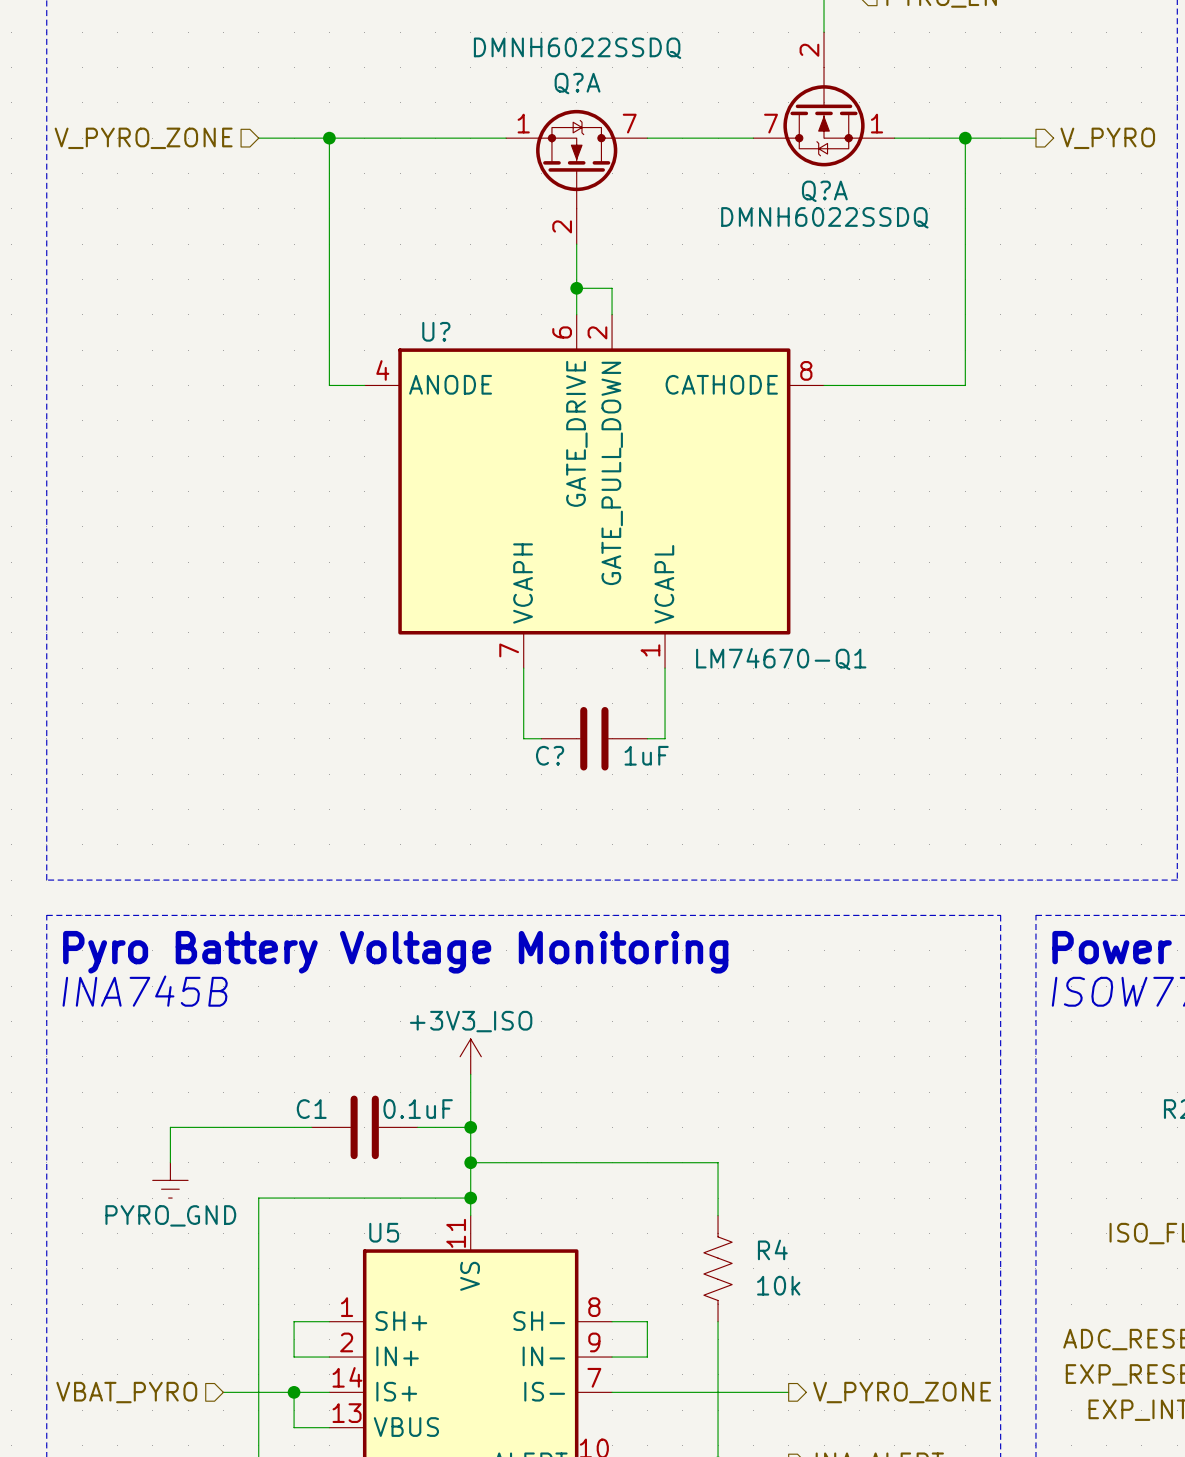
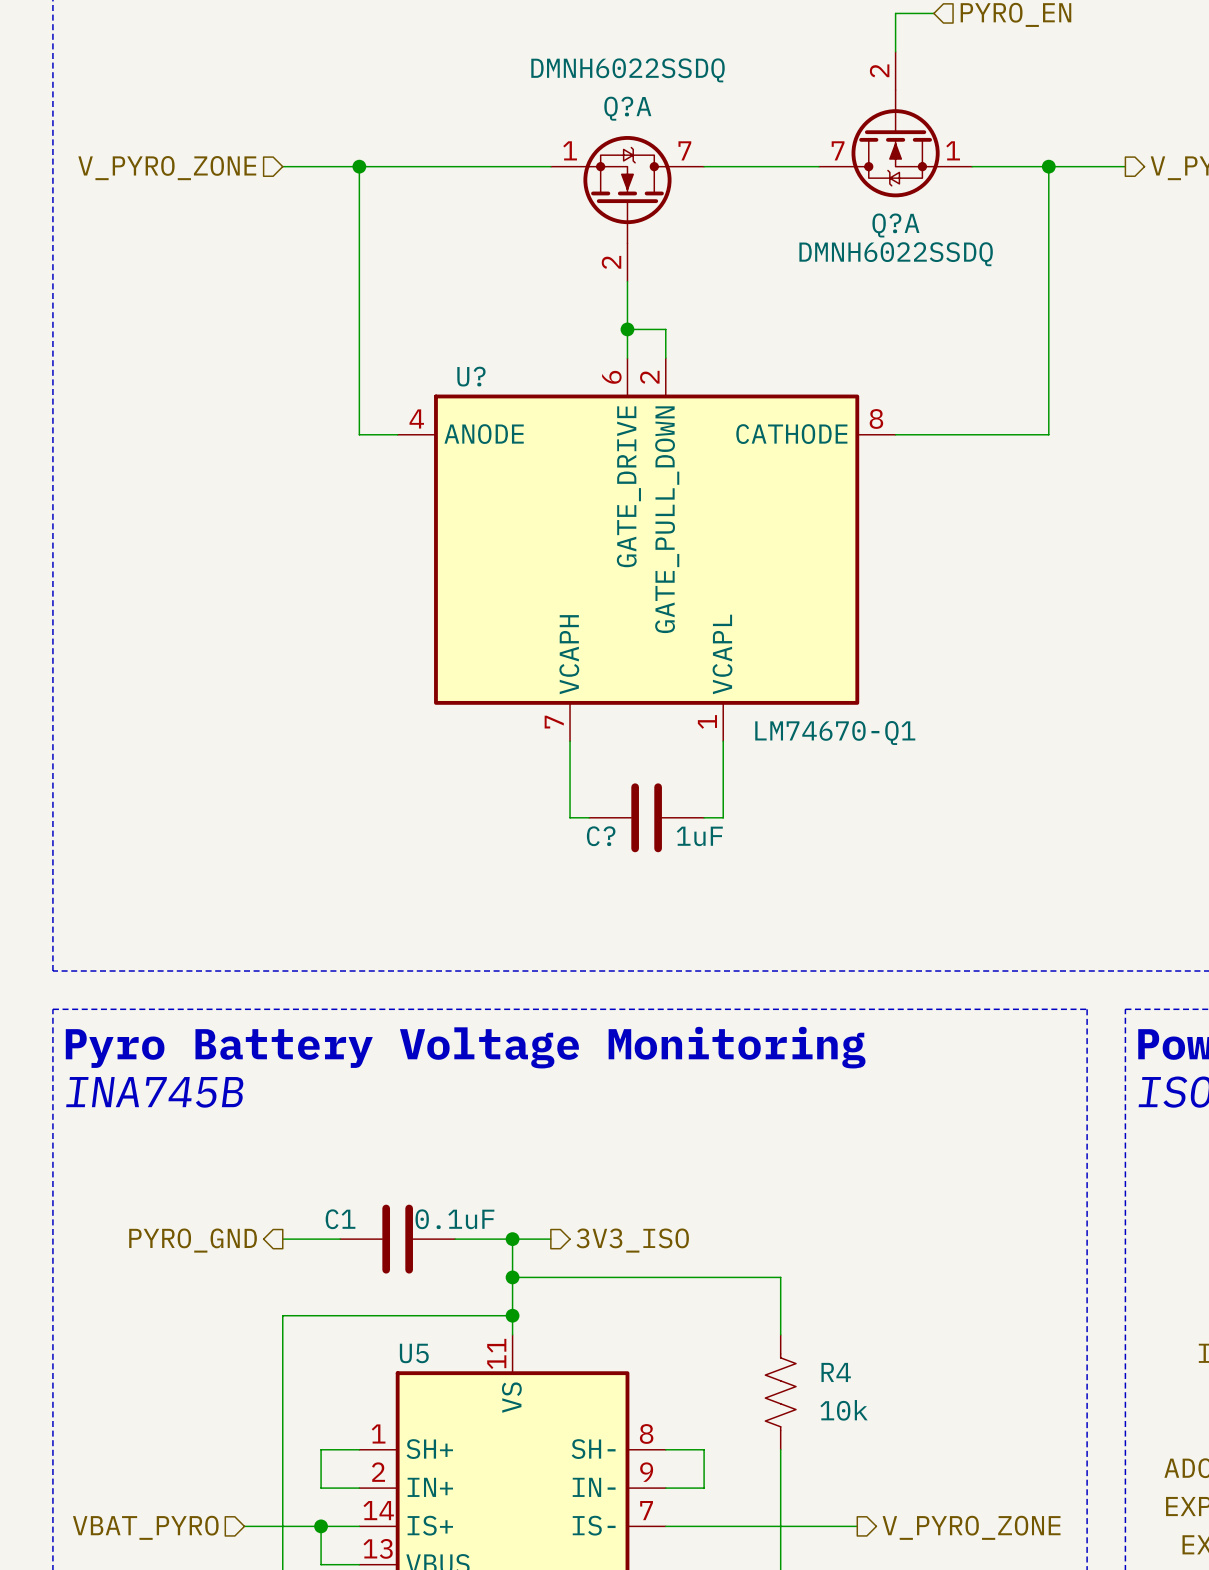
power symbol: +3V3_ISO (470, 1056) -> none
wire: (470, 1074) (470, 1127) -> (550, 1239) (512, 1239)
hierarchical label: none -> PYRO_GND (193, 1240)
wire: (258, 1127) (170, 1127) (170, 1162) -> none
hierarchical label: none -> 3V3_ISO (632, 1240)
power symbol: PYRO_GND (170, 1180) -> none

